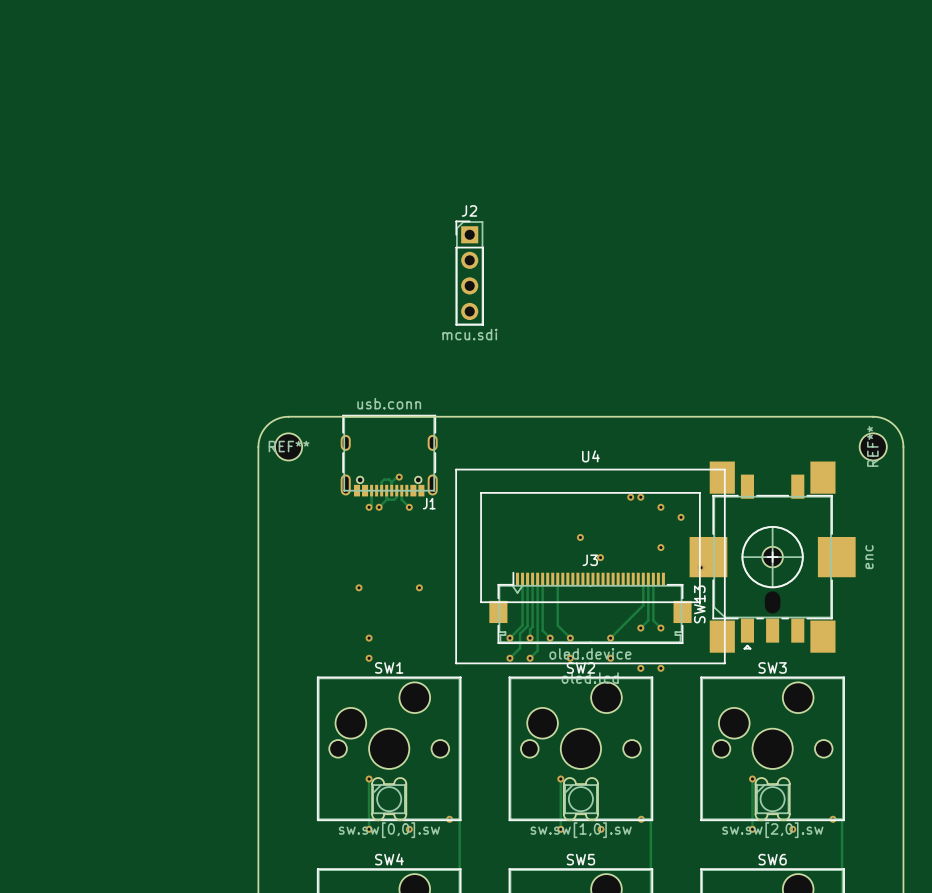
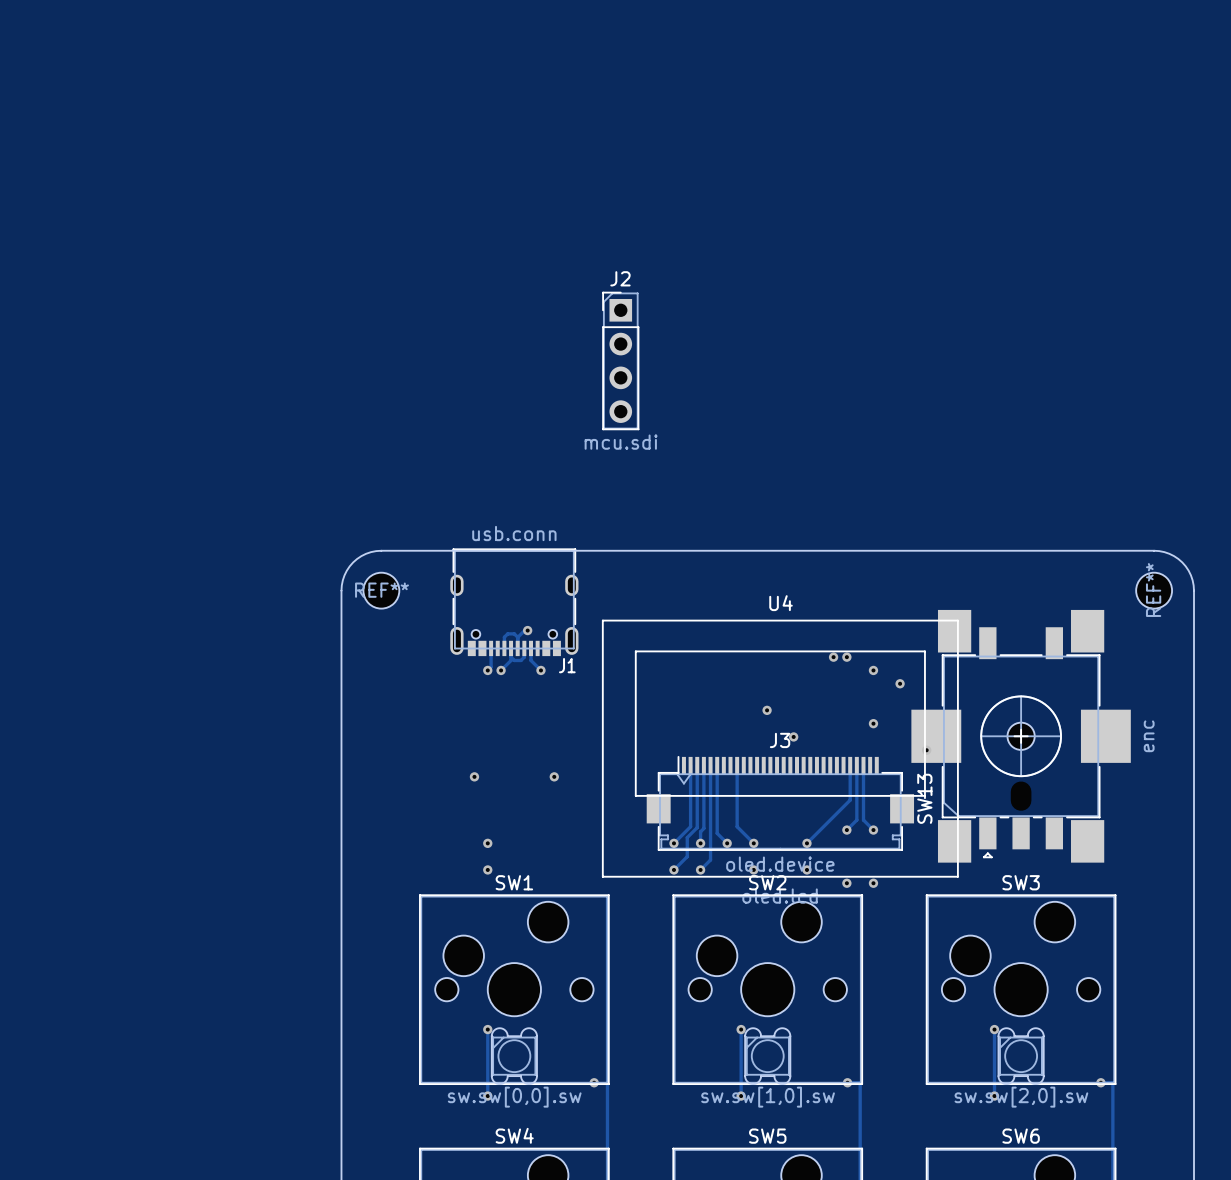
via: (409, 829) -> none
via: (601, 829) -> none
via: (792, 829) -> none

